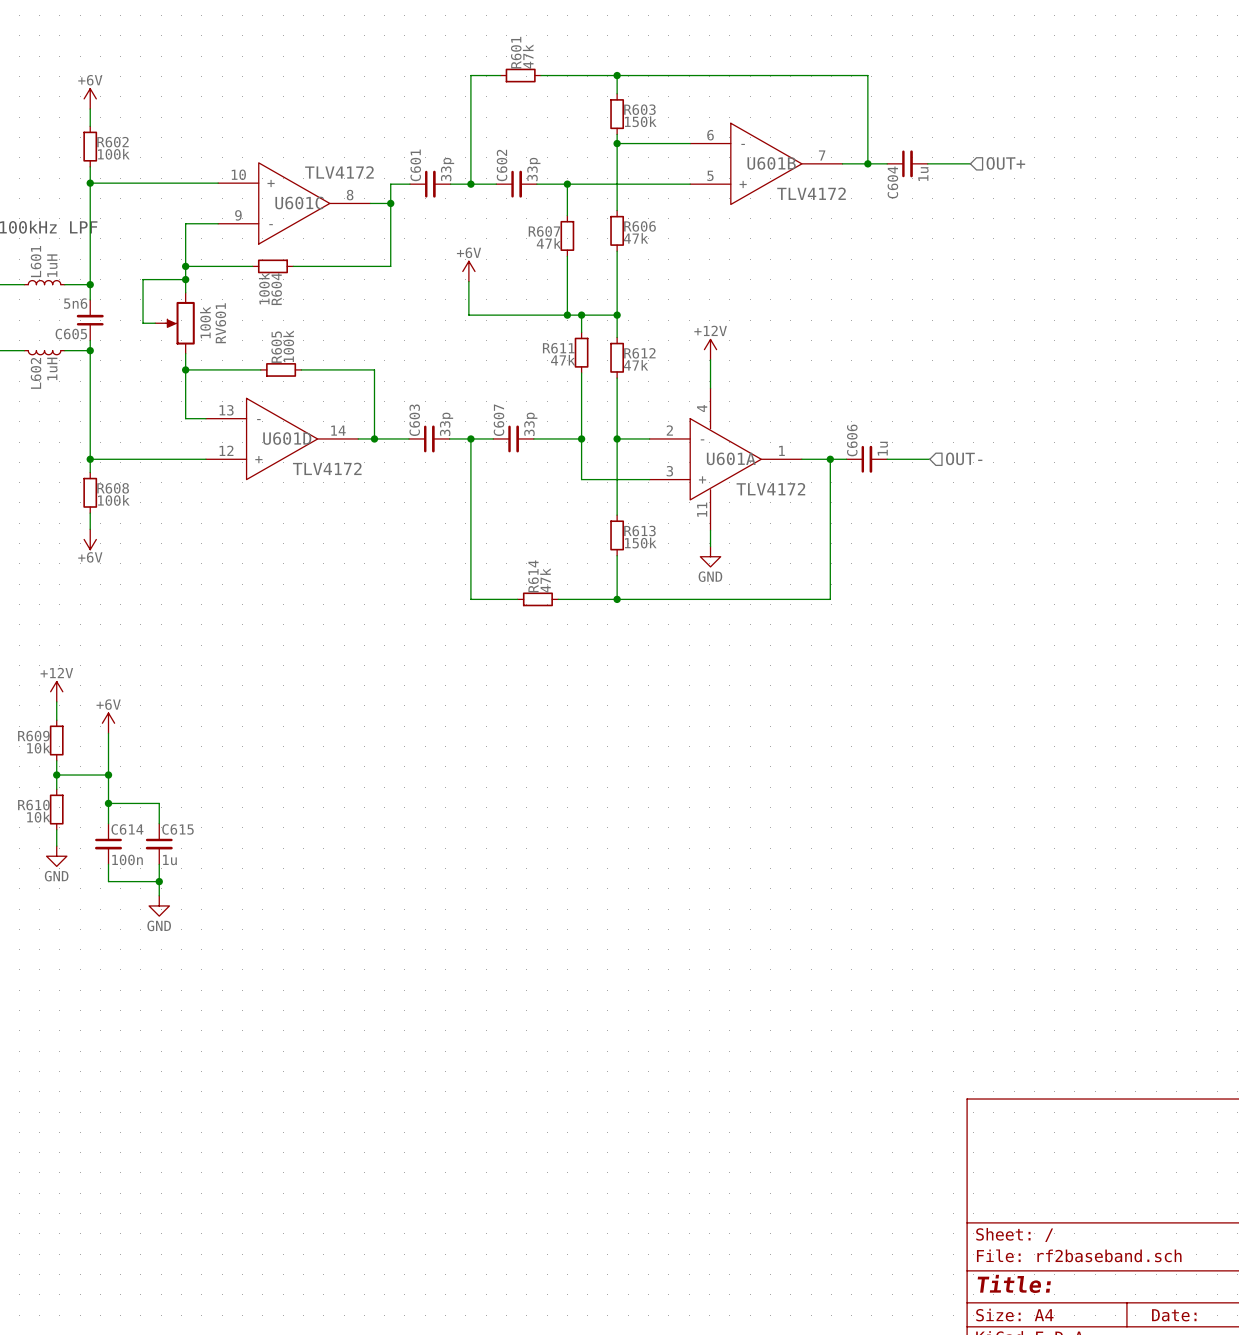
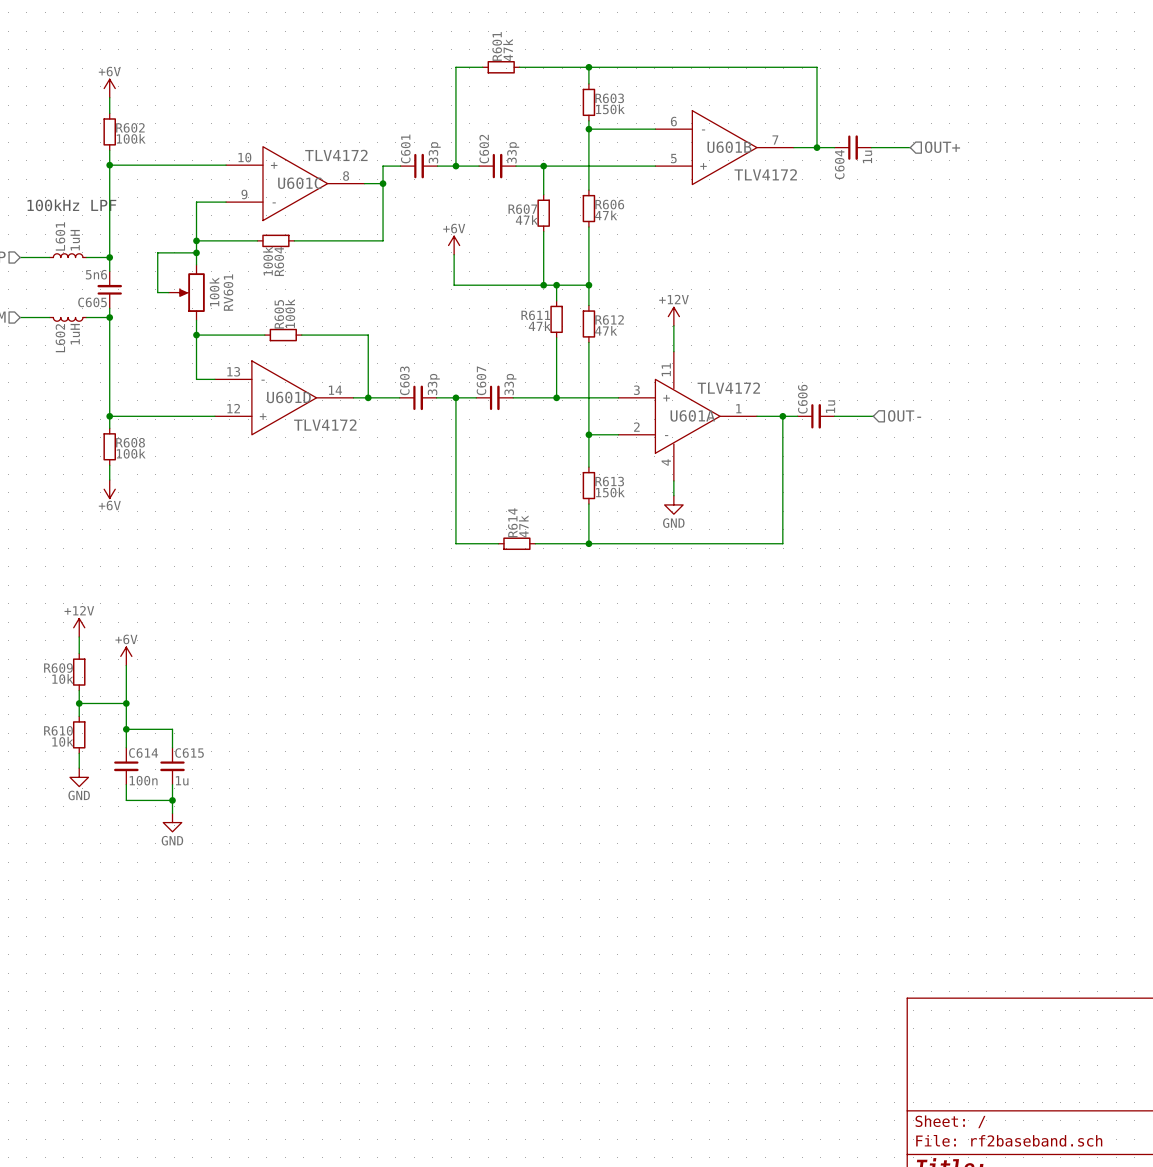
wire: (581, 438) (581, 479) (617, 479) -> (556, 397) (588, 397)
junction position: (617, 438) -> (588, 434)
U601A flip: as is (725, 459) -> up-down (687, 416)

